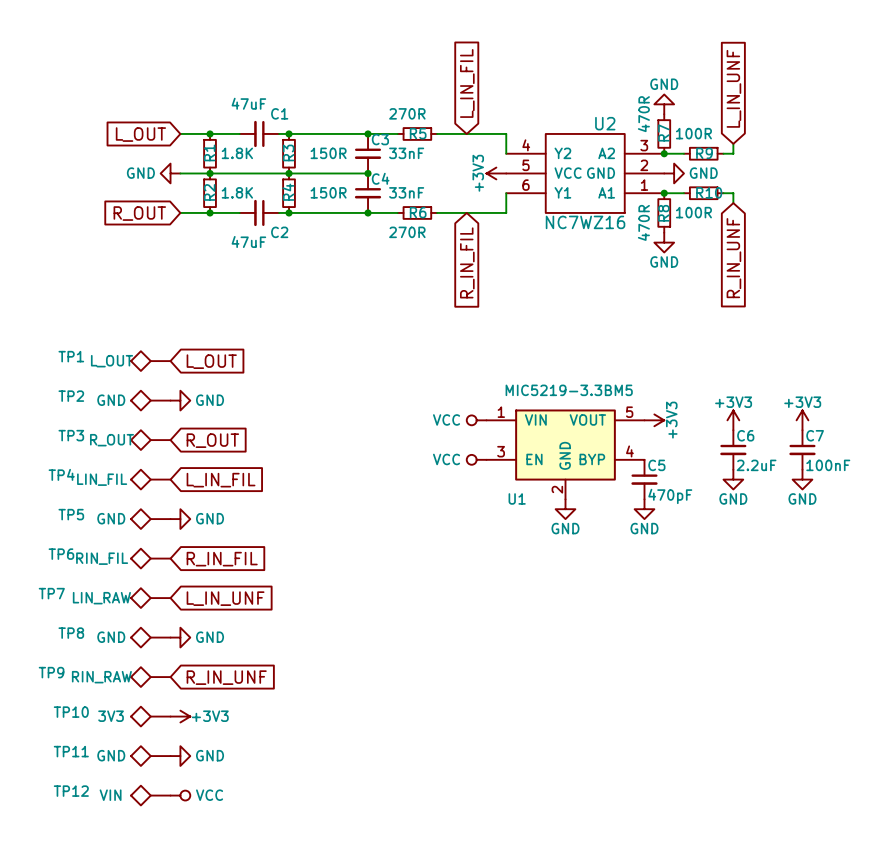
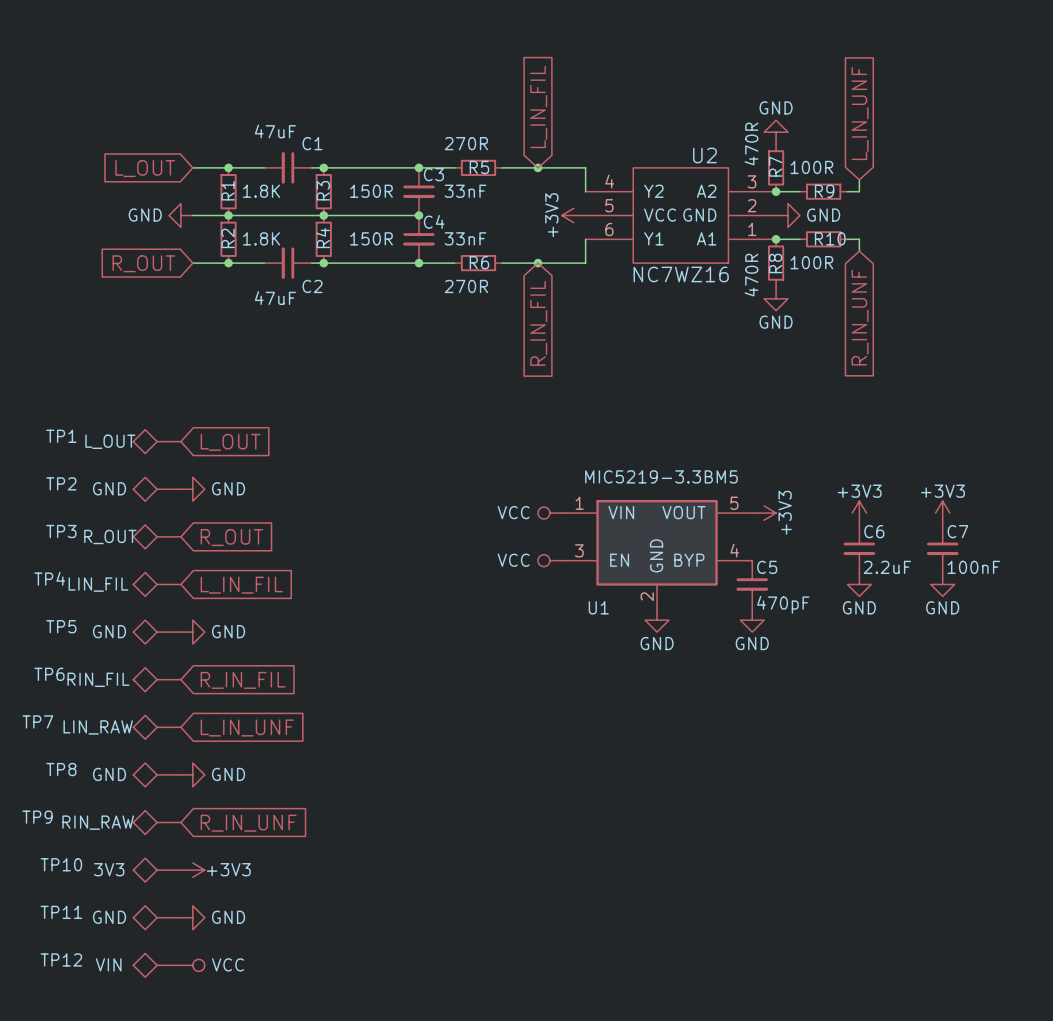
junction: none -> (538, 167)
junction: none -> (538, 263)

